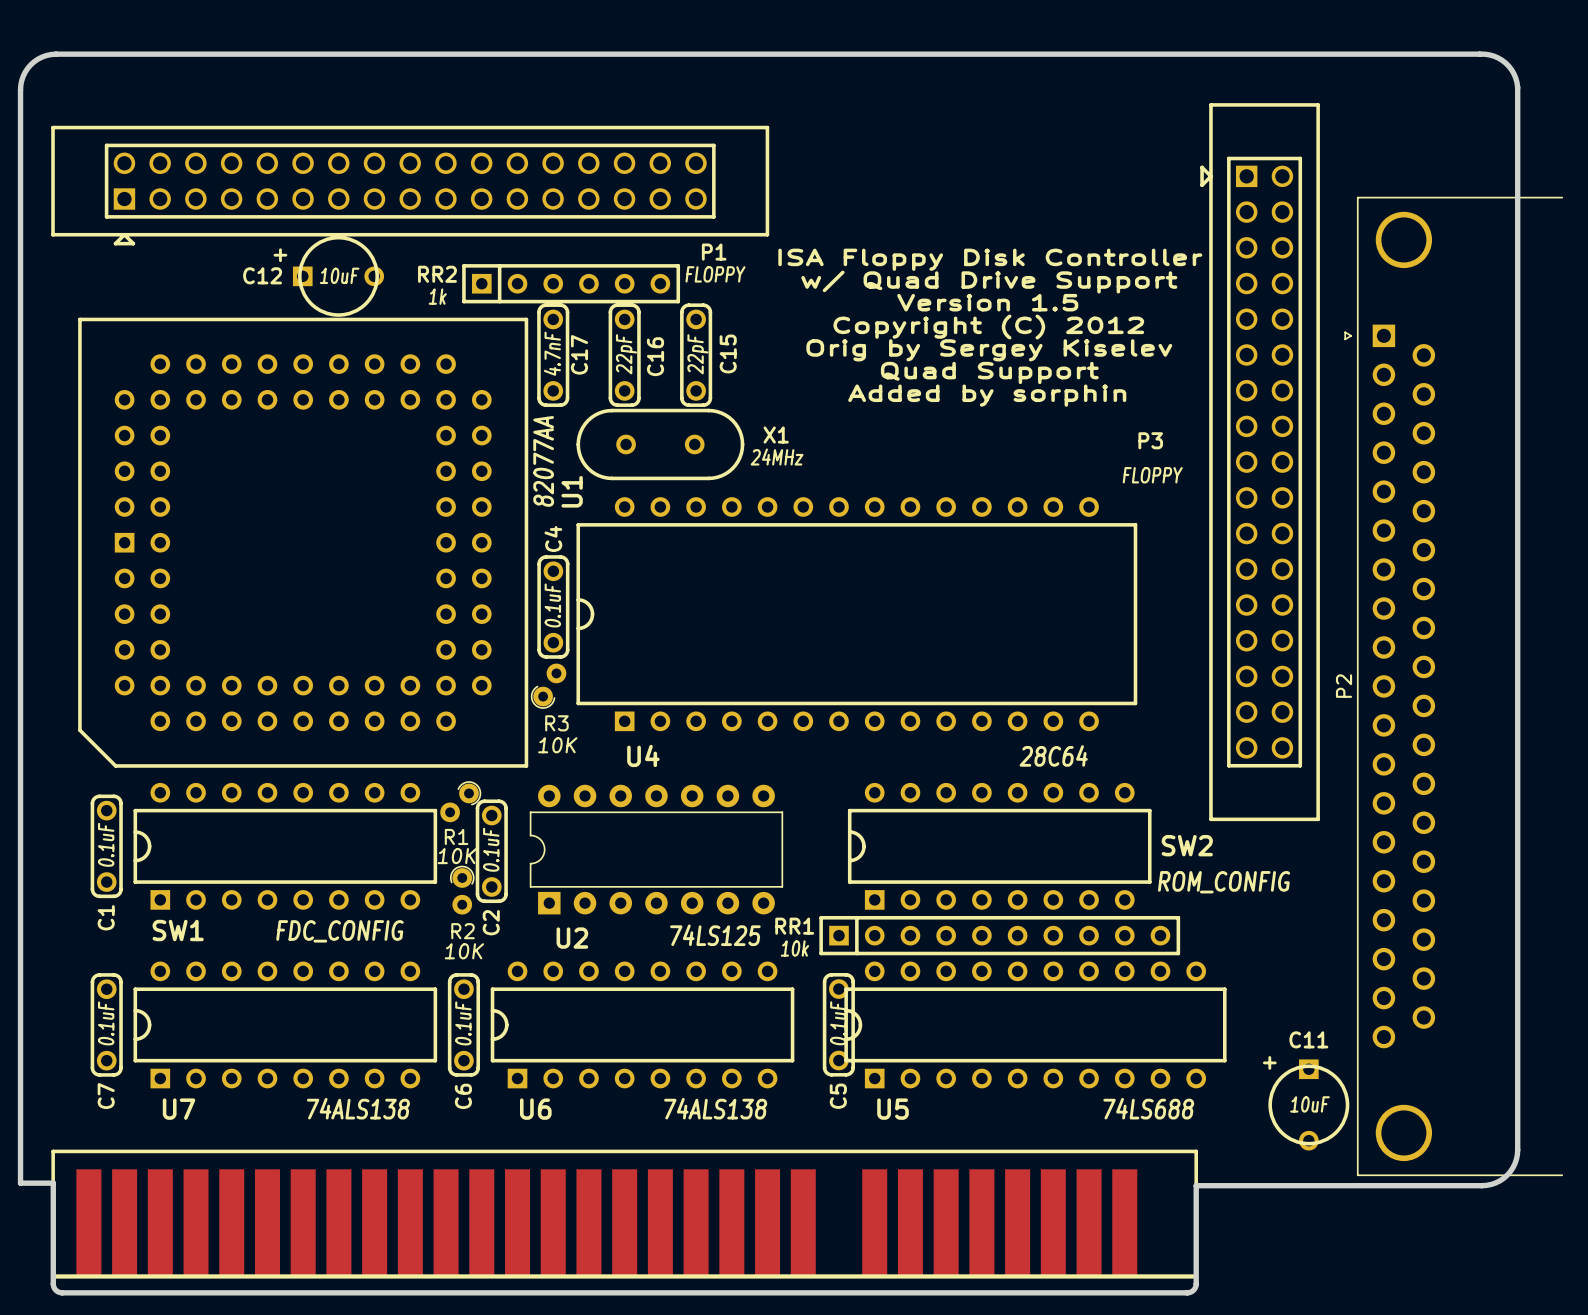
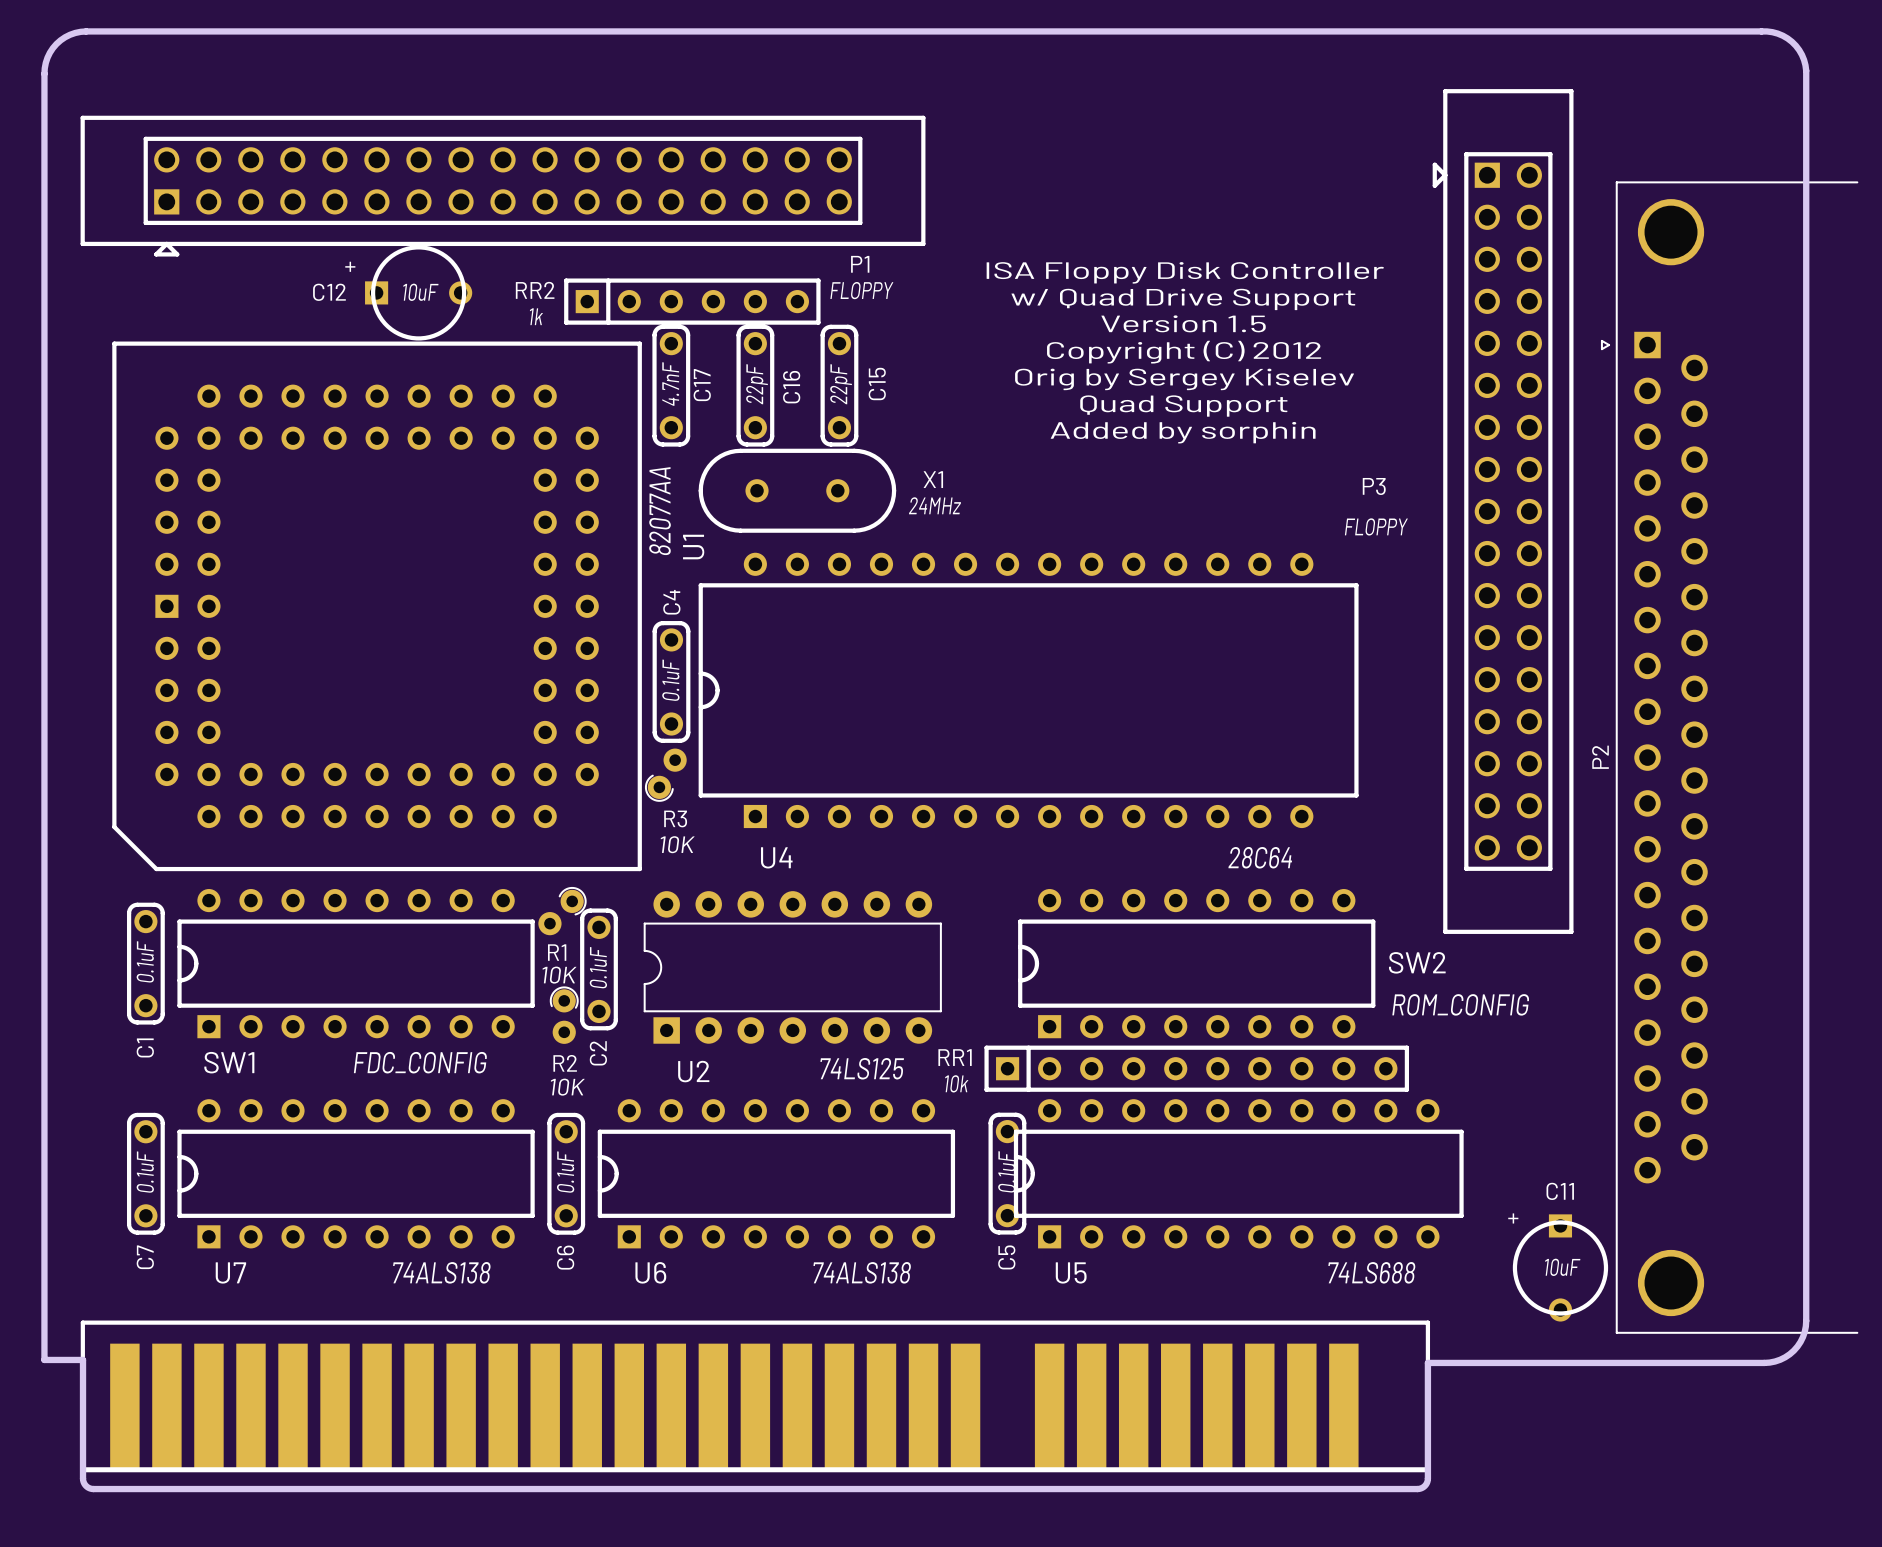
P2 position: (1453, 686) -> (1729, 757)

